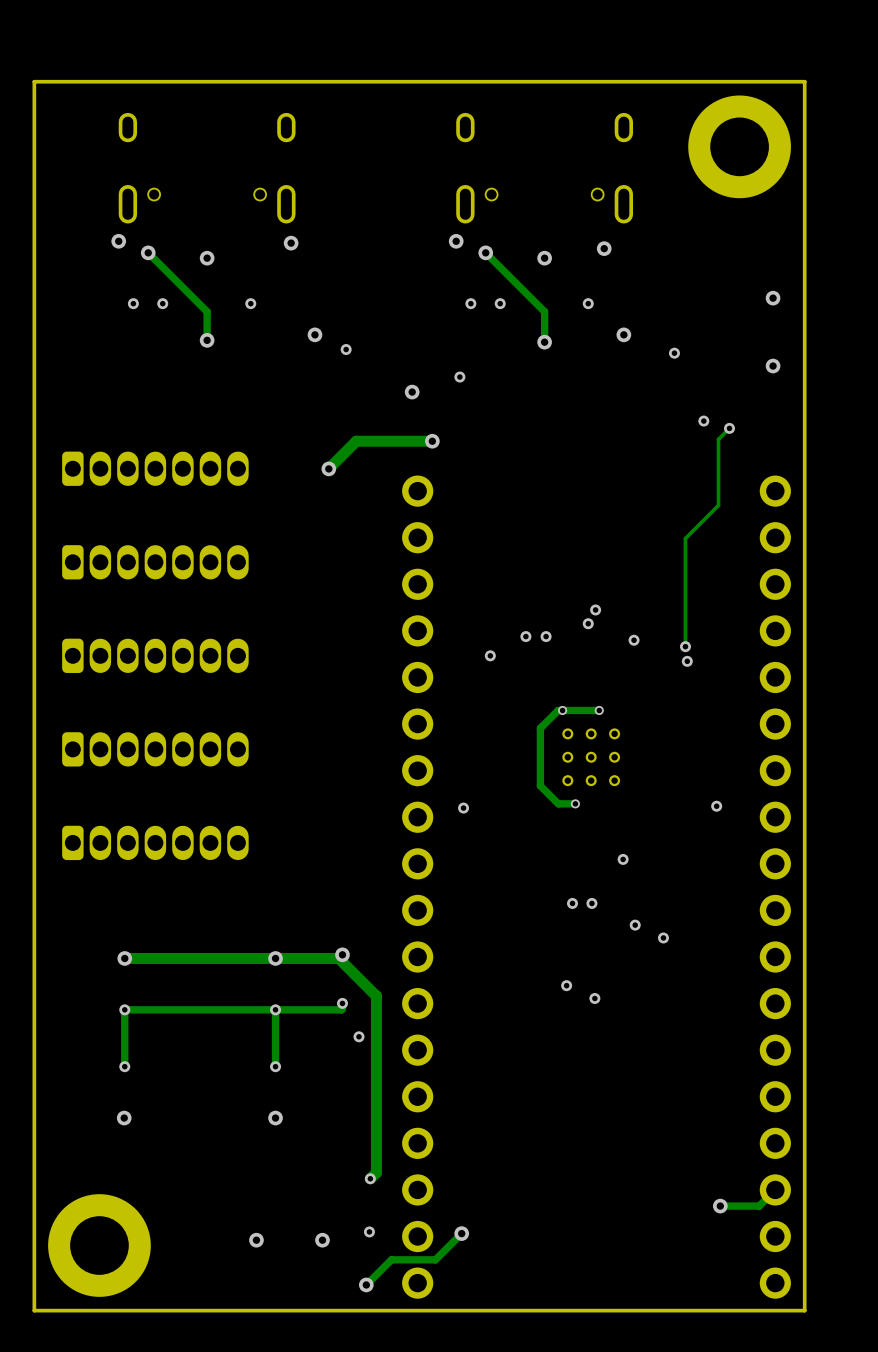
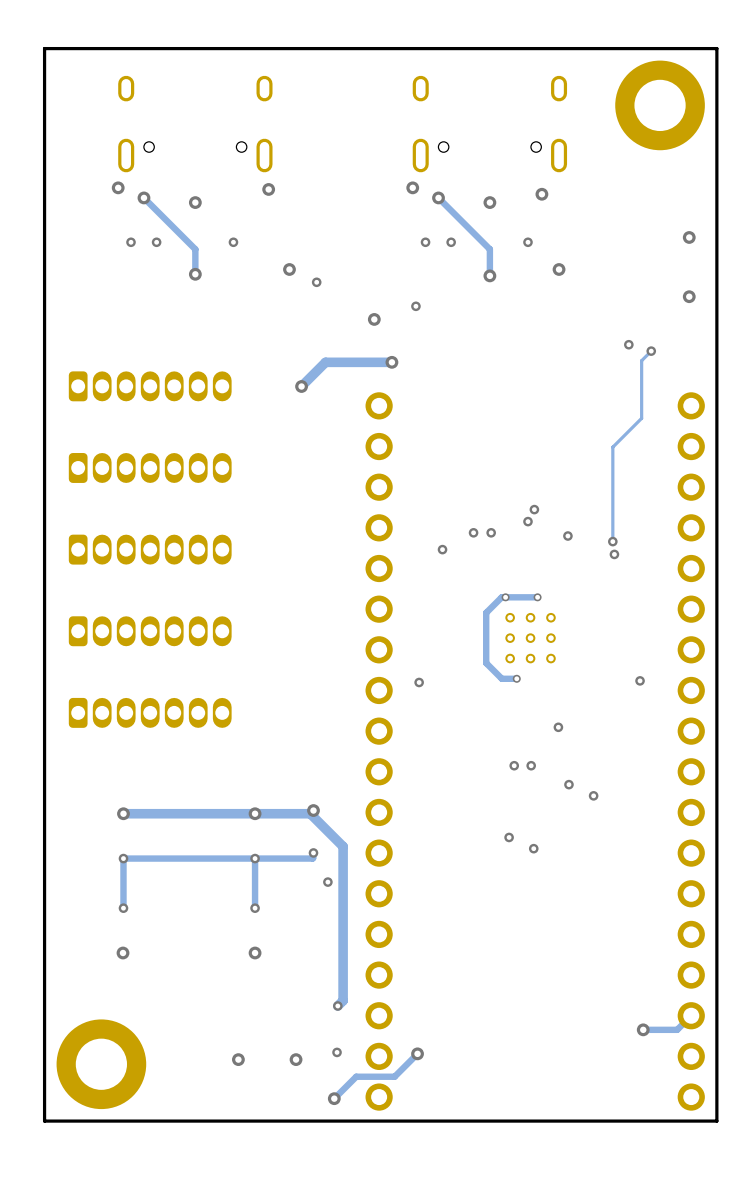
via: (674, 353) -> none

